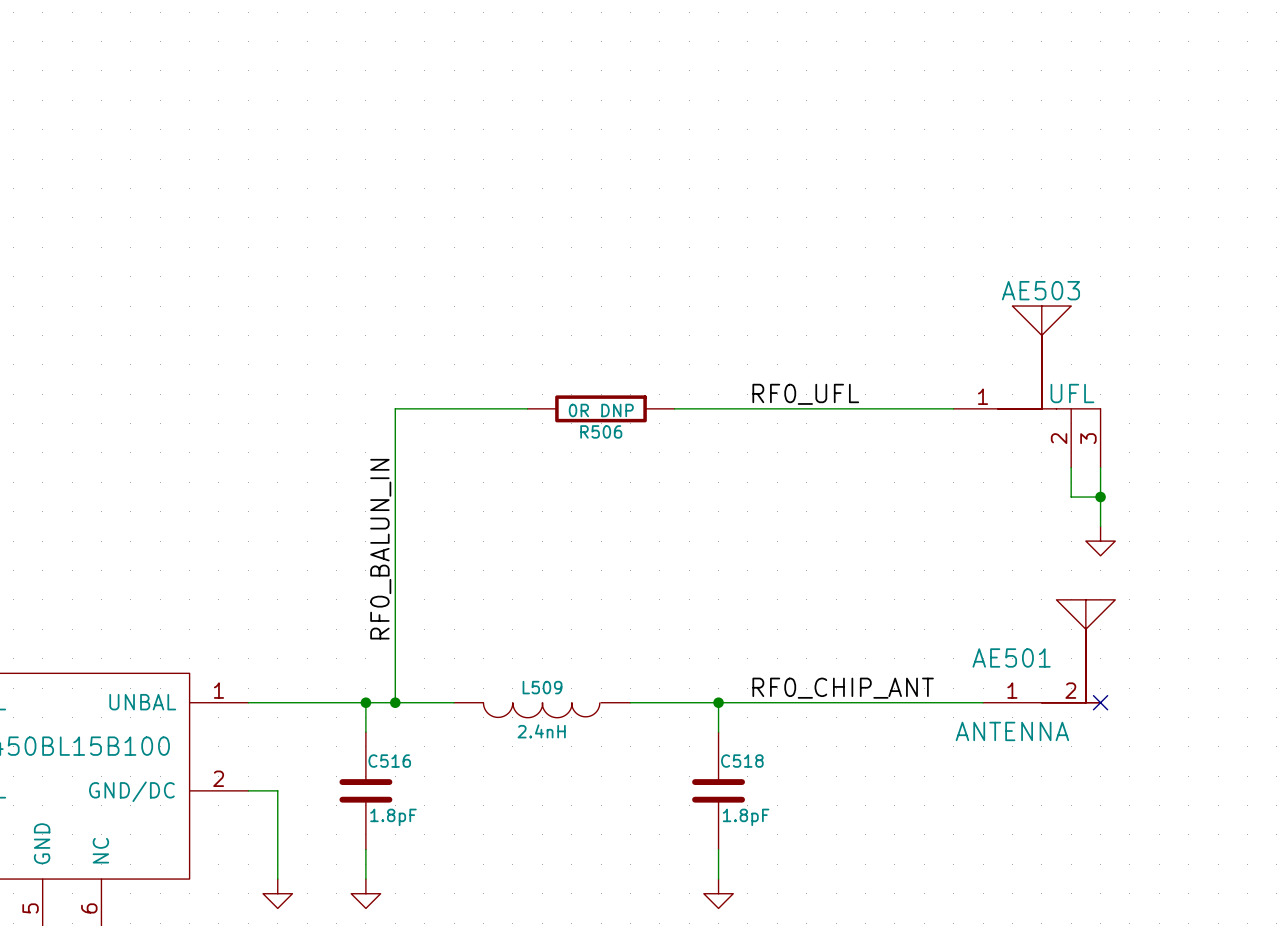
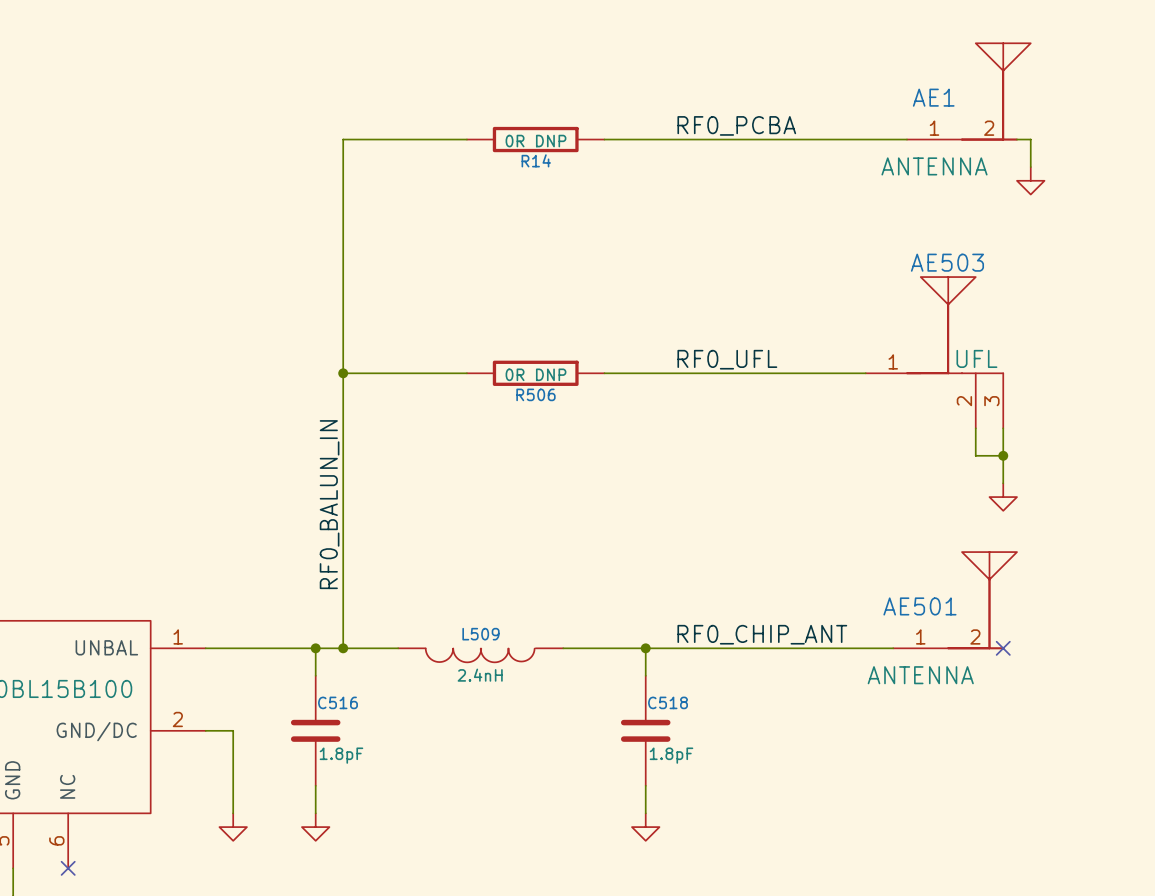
AE1: none -> ANTENNA (968, 91)
label: none -> RF0_PCBA (736, 125)
wire: none -> (466, 139) (343, 139) (343, 373)
R14: none -> 0R DNP (535, 139)
wire: none -> (604, 139) (906, 139)
wire: none -> (1017, 139) (1030, 139) (1030, 167)
power symbol: none -> (1030, 180)
junction: none -> (343, 373)

